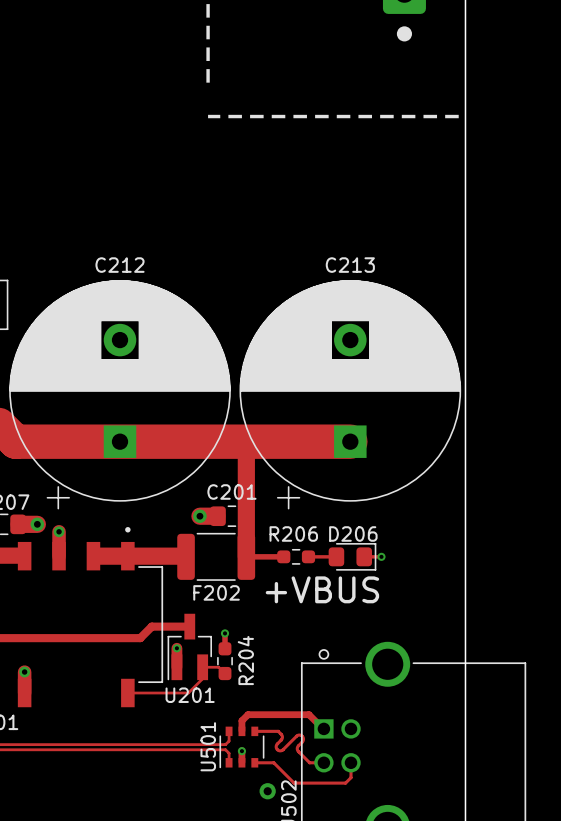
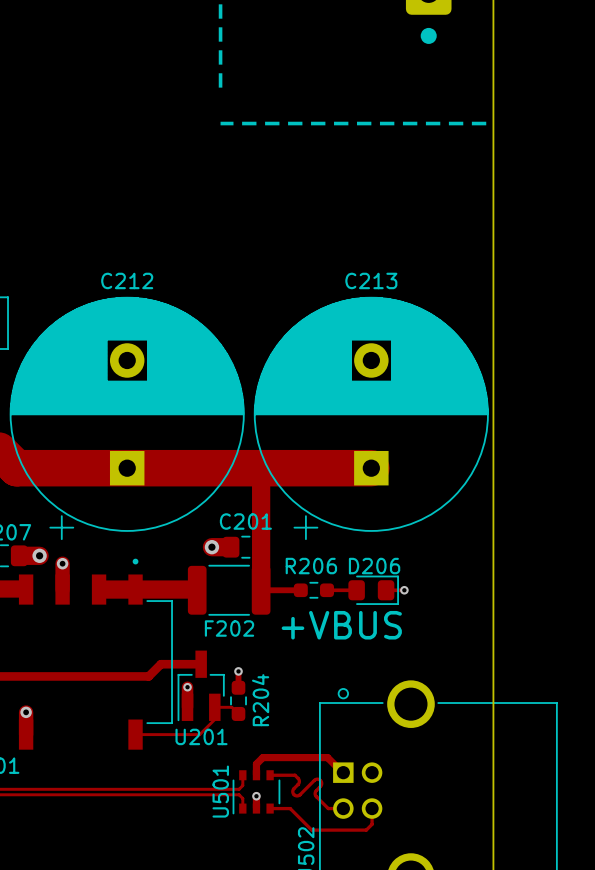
via: (267, 791) -> none

